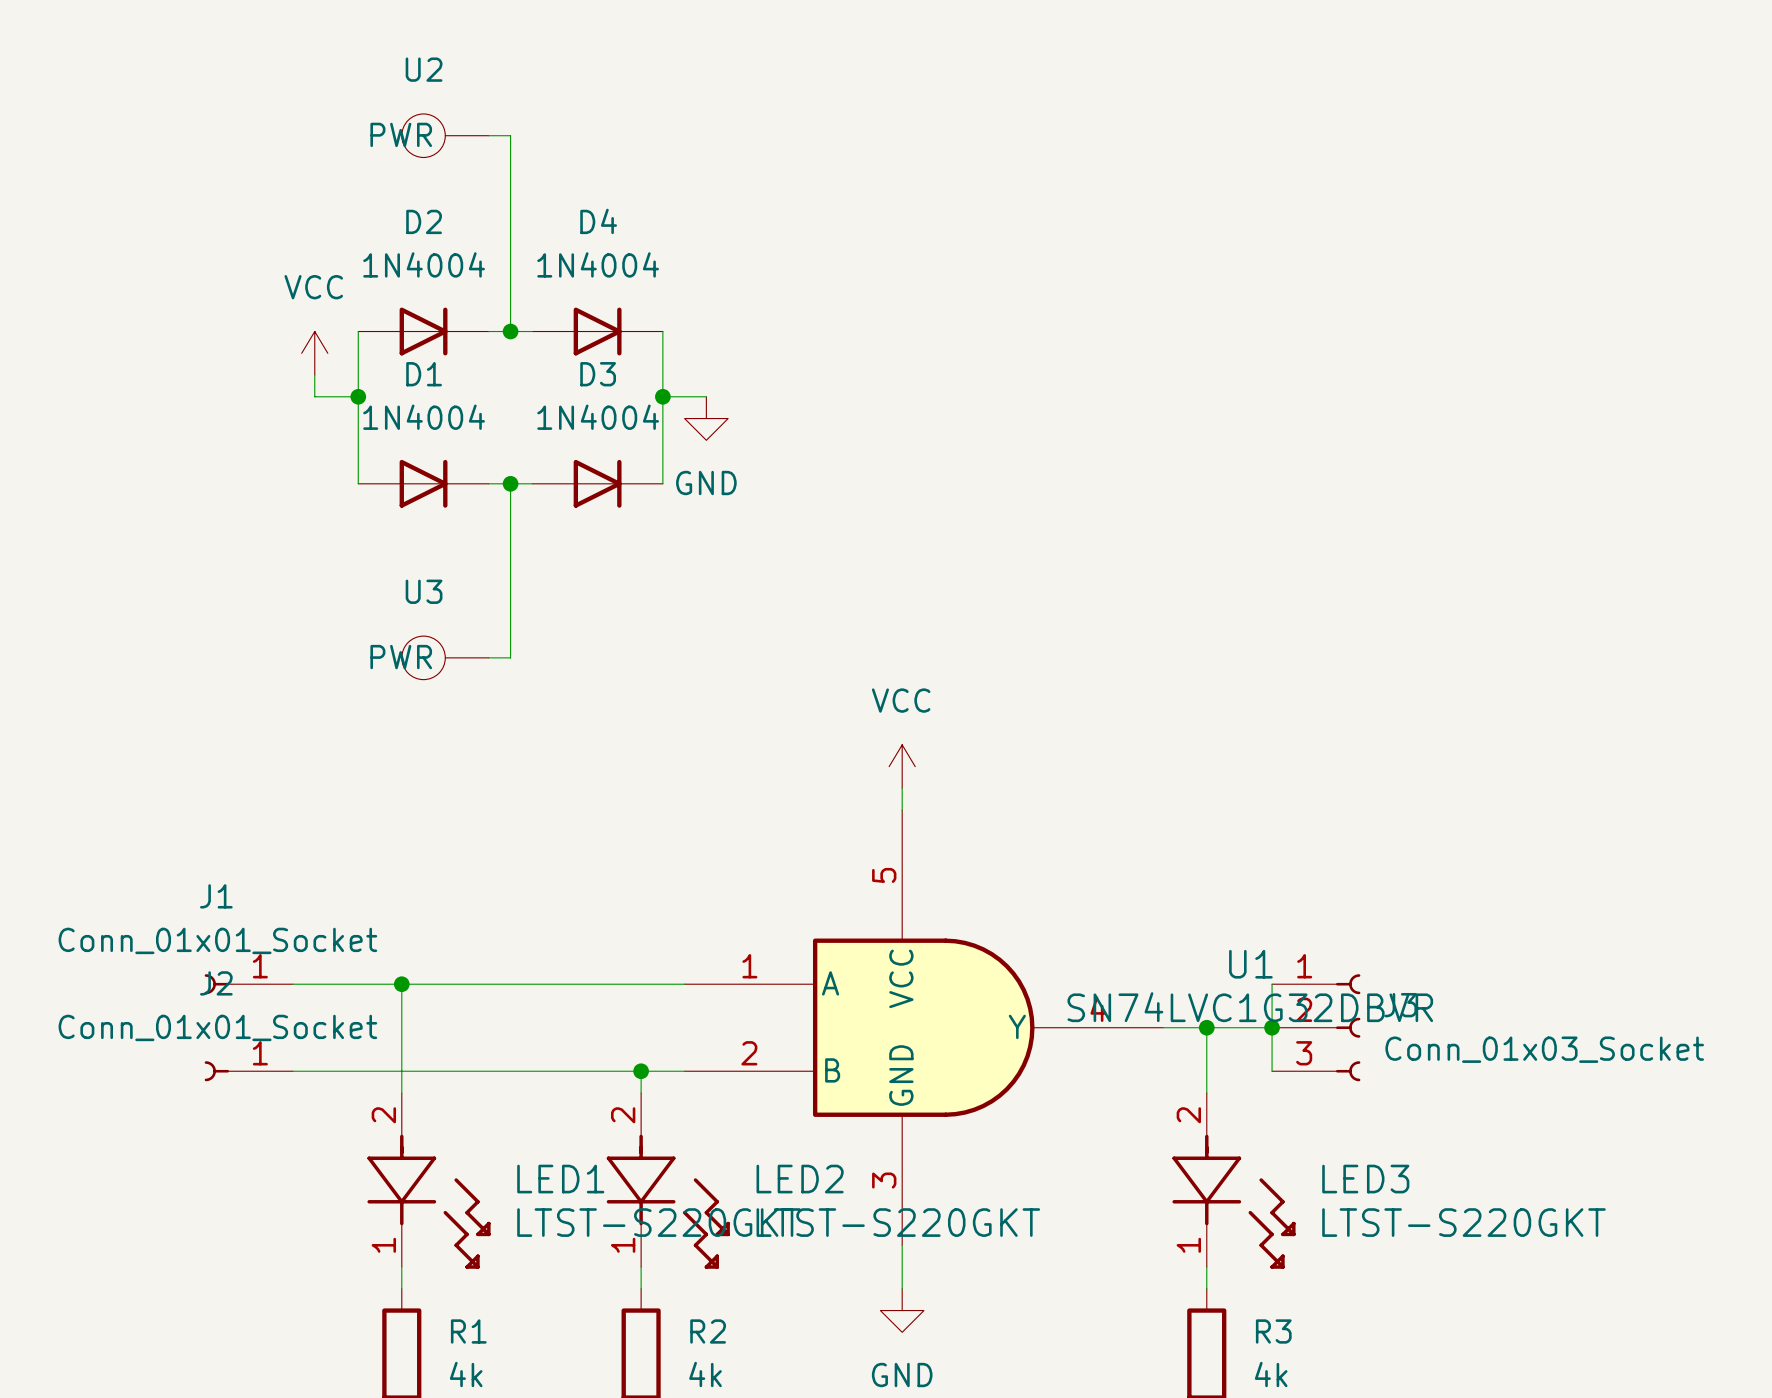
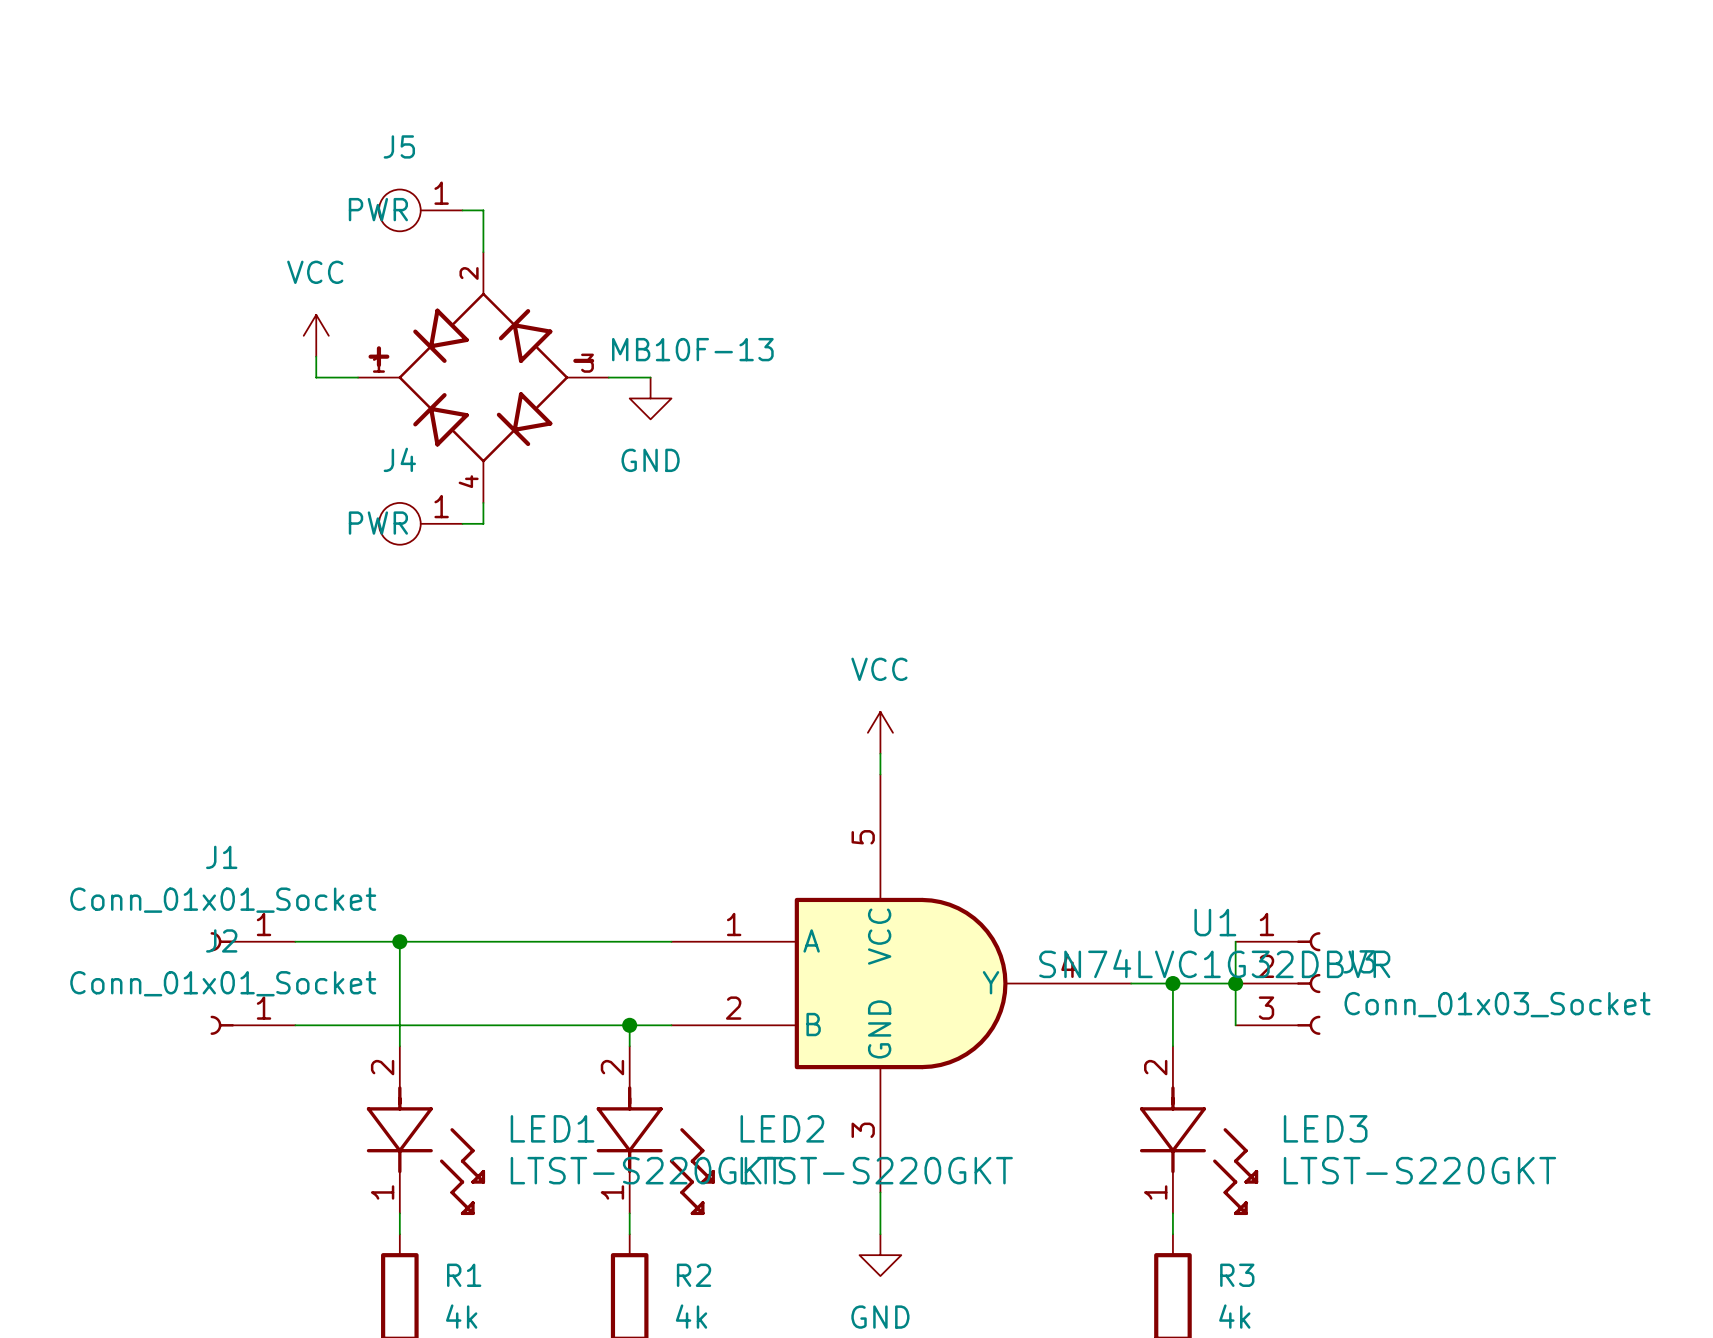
U2: (445, 135) -> none
wire: (488, 135) (510, 135) (510, 331) -> none
J5: none -> (420, 210)
wire: none -> (462, 210) (483, 210) (483, 252)
wire: (358, 331) (358, 483) -> none
D2: 1N4004 (423, 331) -> none
wire: (488, 331) (532, 331) -> none
junction: (510, 331) -> none
D4: 1N4004 (597, 331) -> none
wire: (662, 331) (662, 483) -> none
junction: (358, 396) -> none
part: none -> MB10F-13 (483, 377)
wire: (662, 396) (706, 396) -> (650, 377) (608, 377)
junction: (662, 396) -> none
power symbol position: GND (706, 418) -> GND (650, 398)
D1: 1N4004 (423, 483) -> none
wire: (488, 483) (532, 483) -> none
wire: (510, 483) (510, 657) (488, 657) -> none
junction: (510, 483) -> none
D3: 1N4004 (597, 483) -> none
wire: none -> (483, 502) (483, 523) (462, 523)
J4: none -> (420, 523)
U3: (445, 657) -> none

